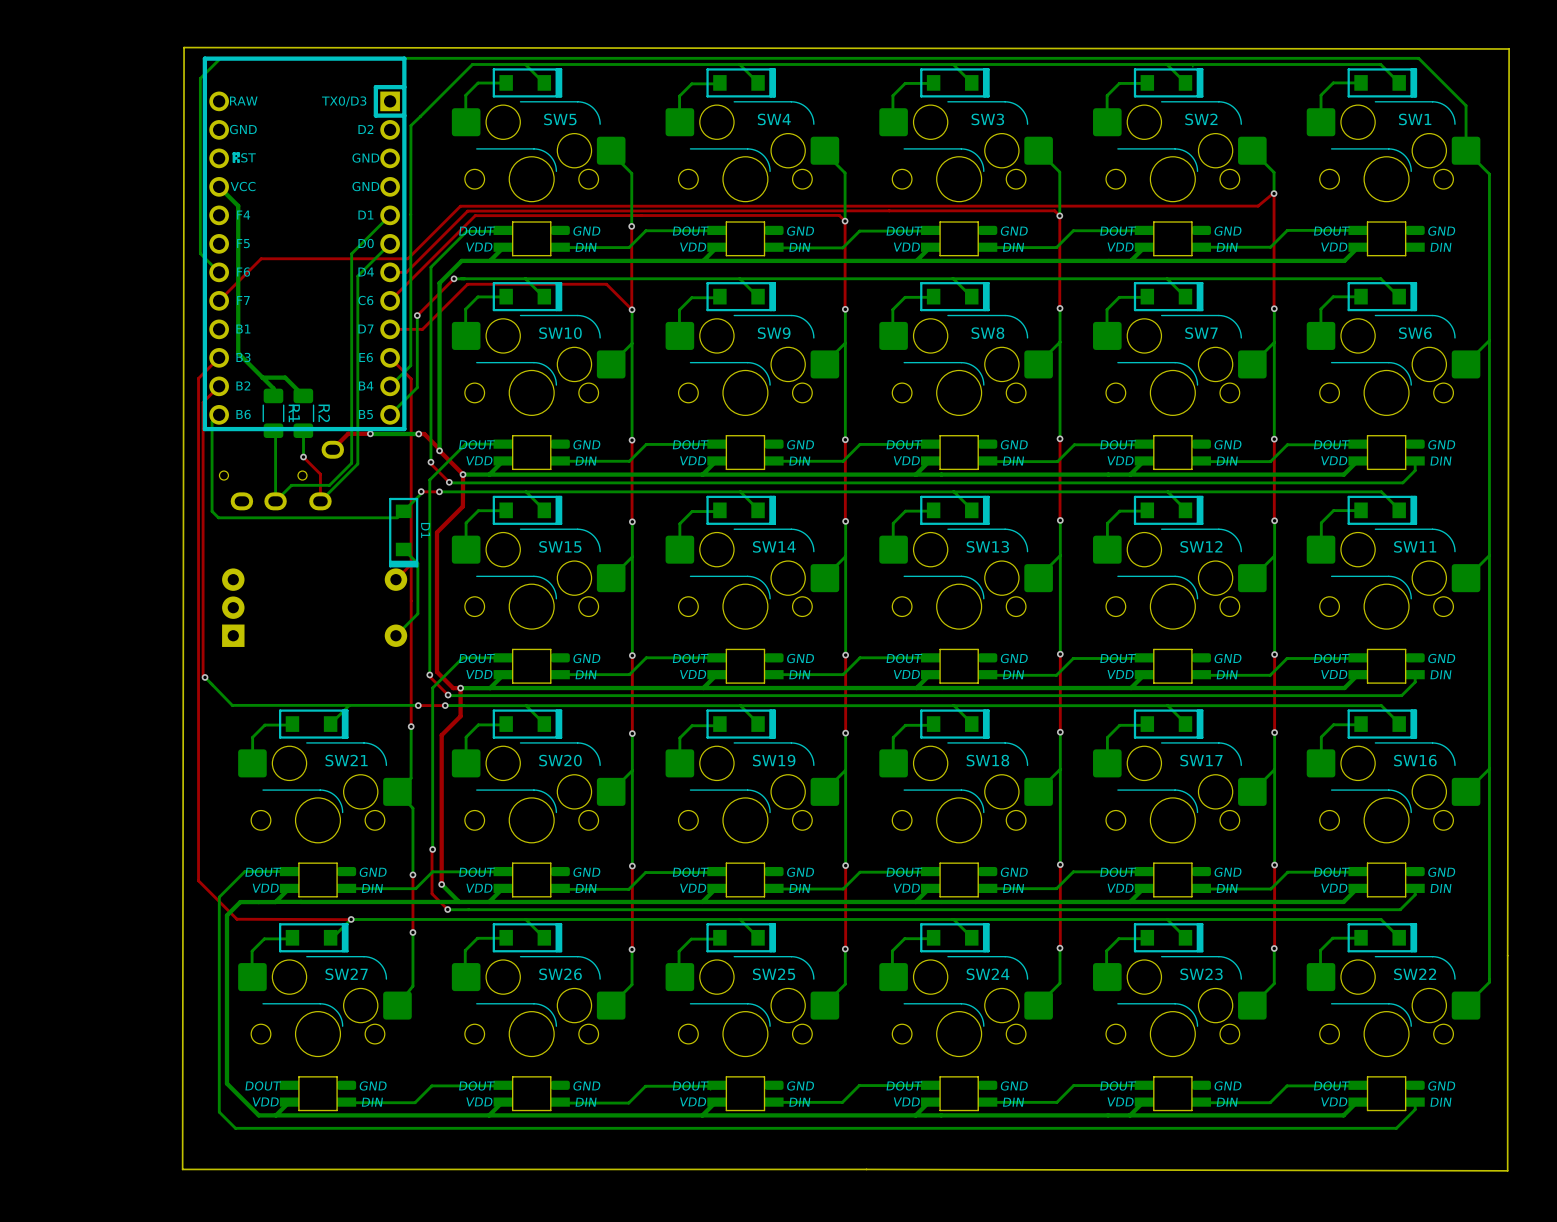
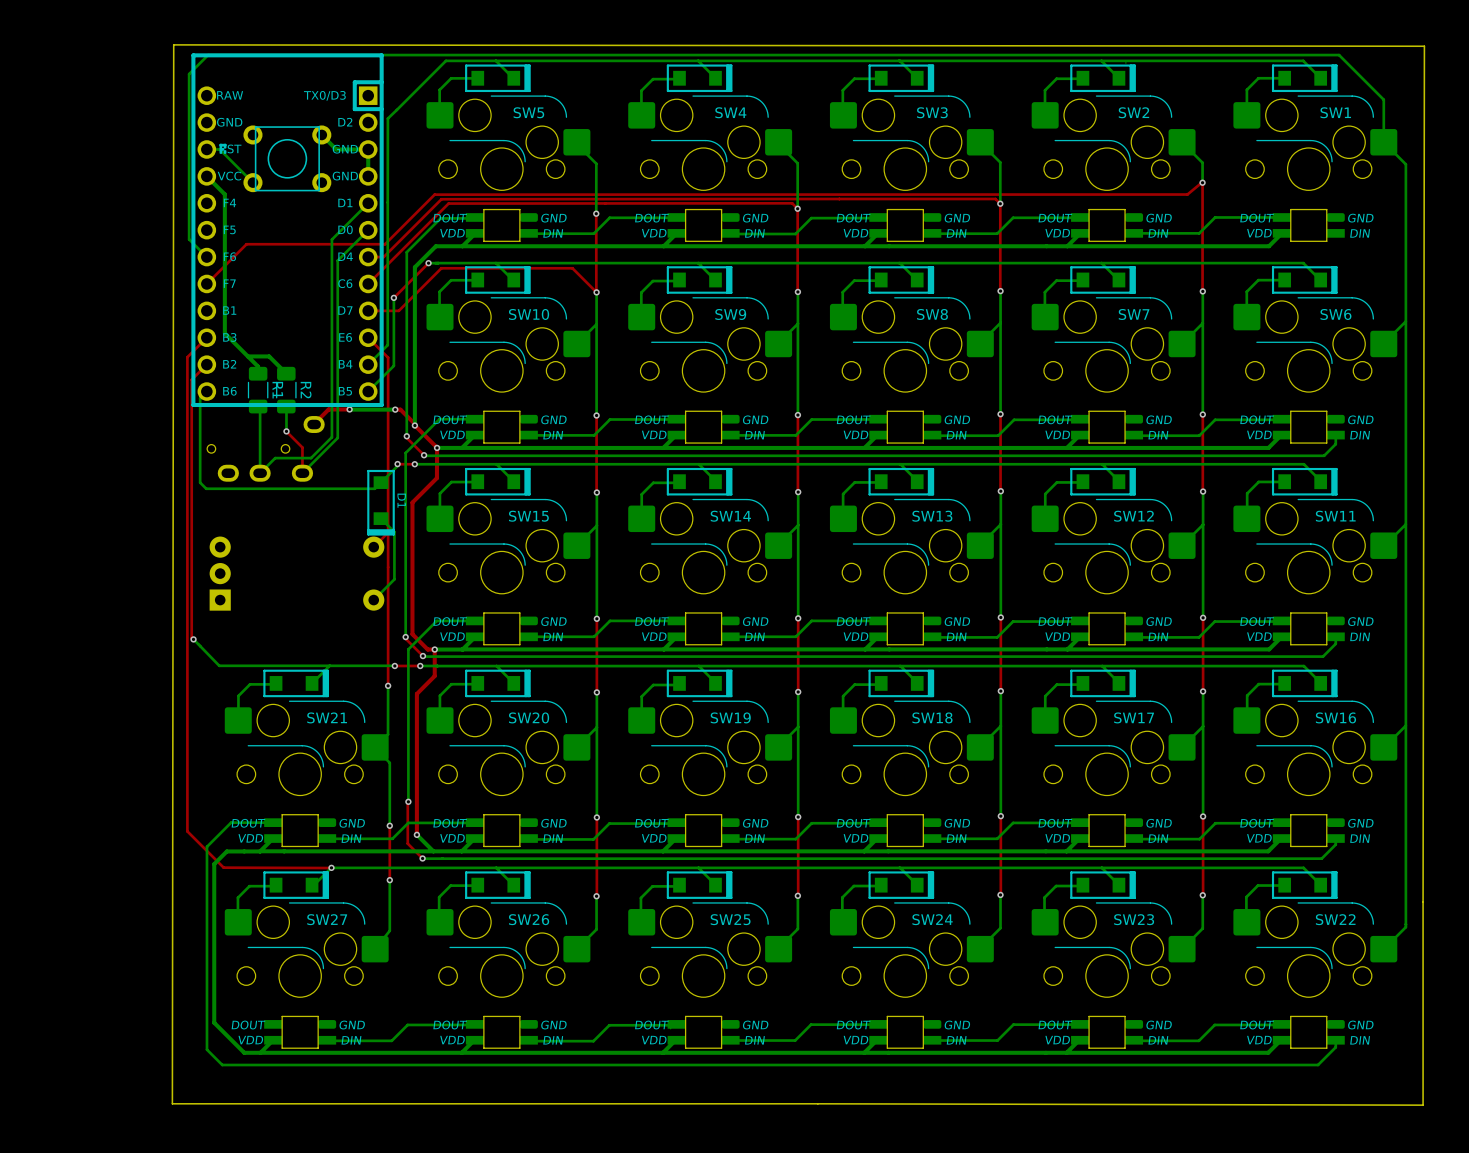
bottom track: none -> (321, 134) (336, 149) (368, 149) (368, 176)
bottom track: none -> (206, 149) (219, 149) (252, 182)
part: none -> (287, 158)

